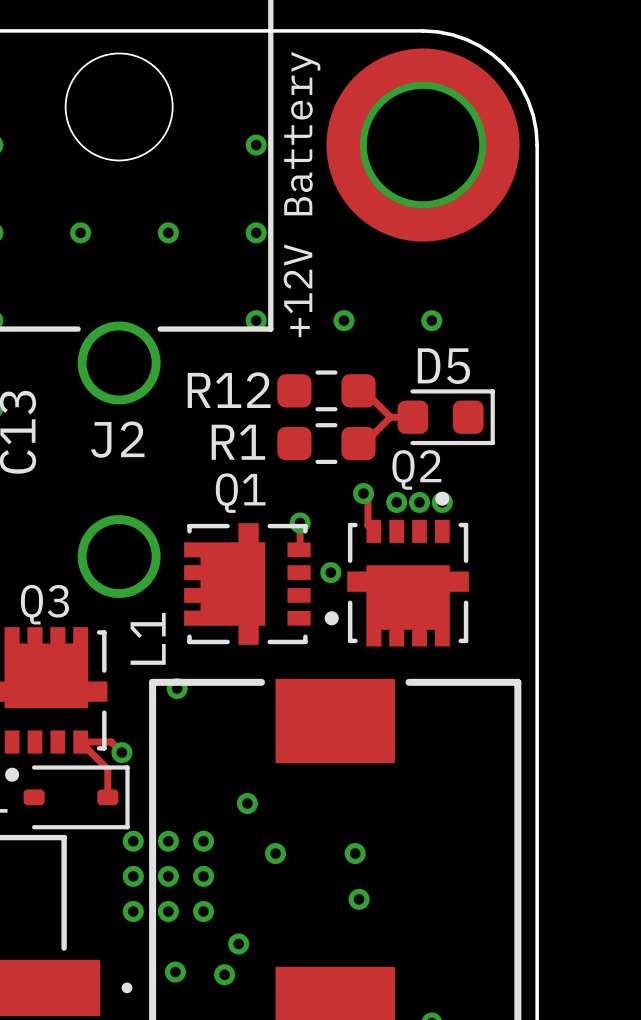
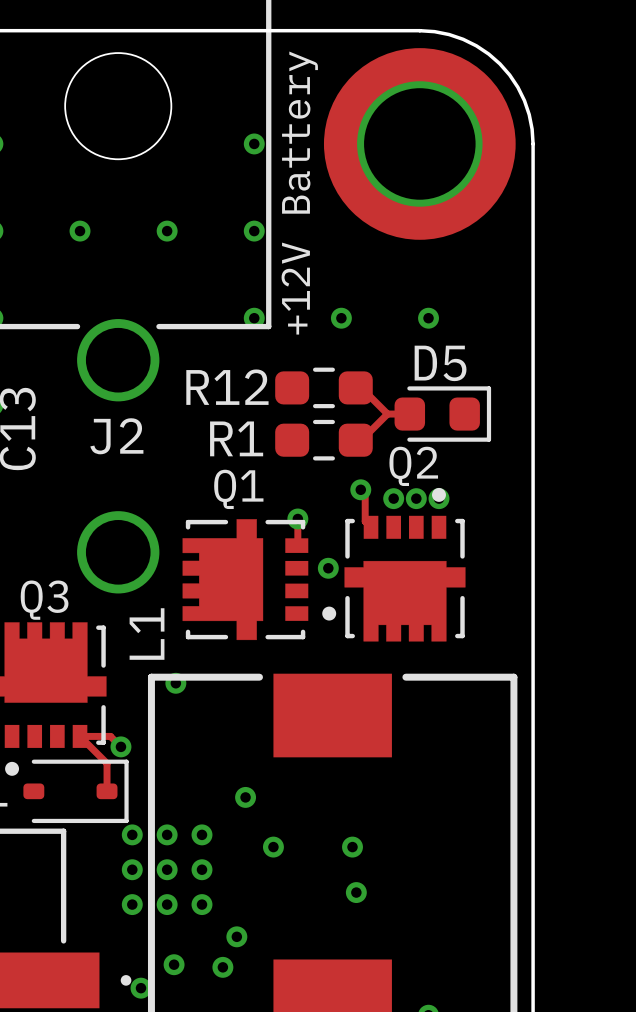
via: none -> (141, 988)

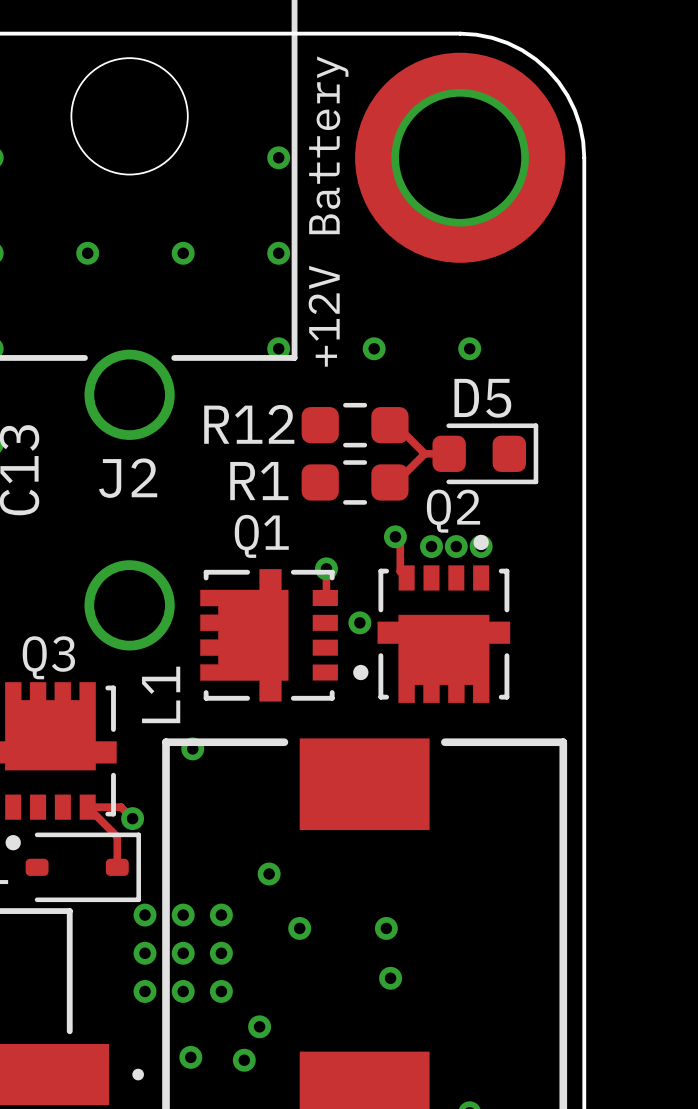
via: (141, 988) -> none

